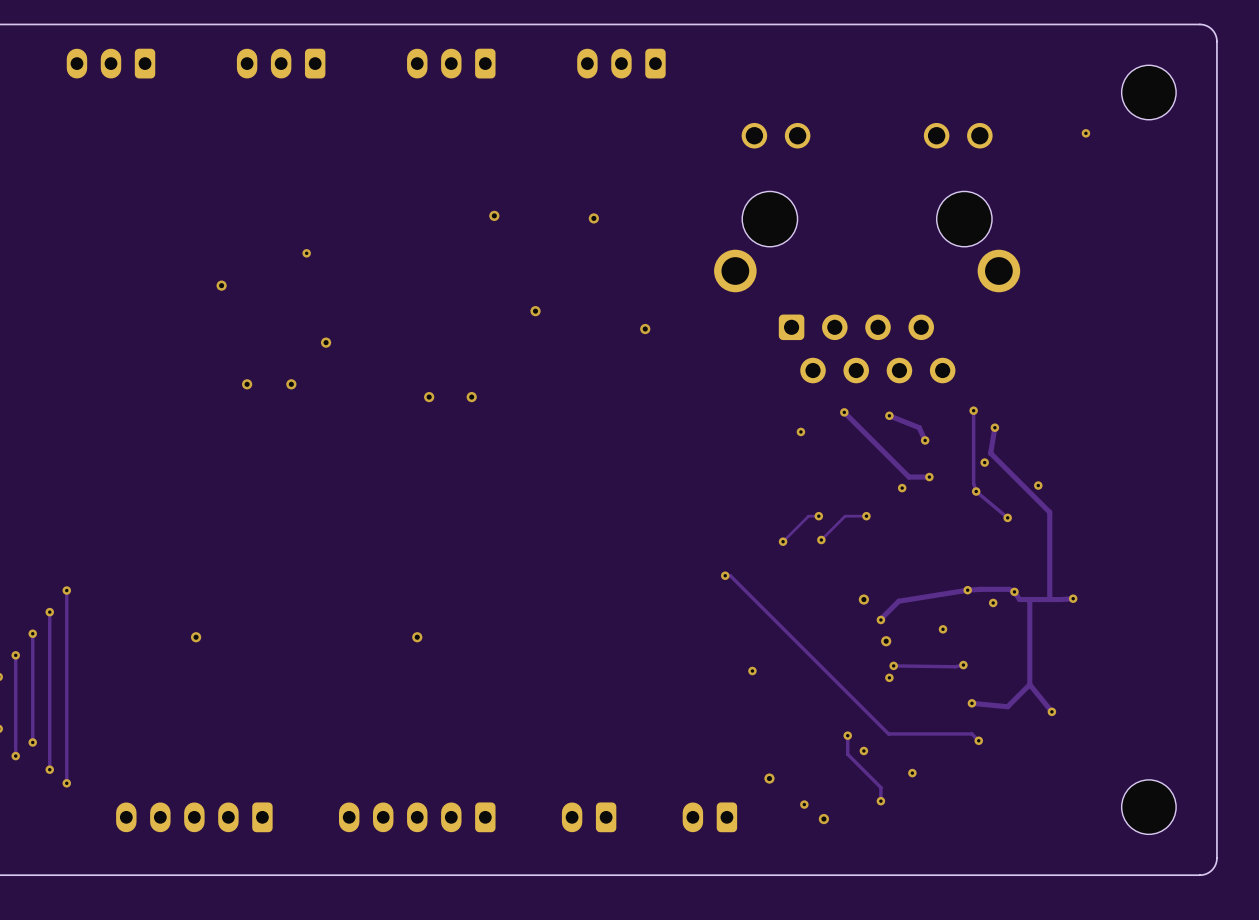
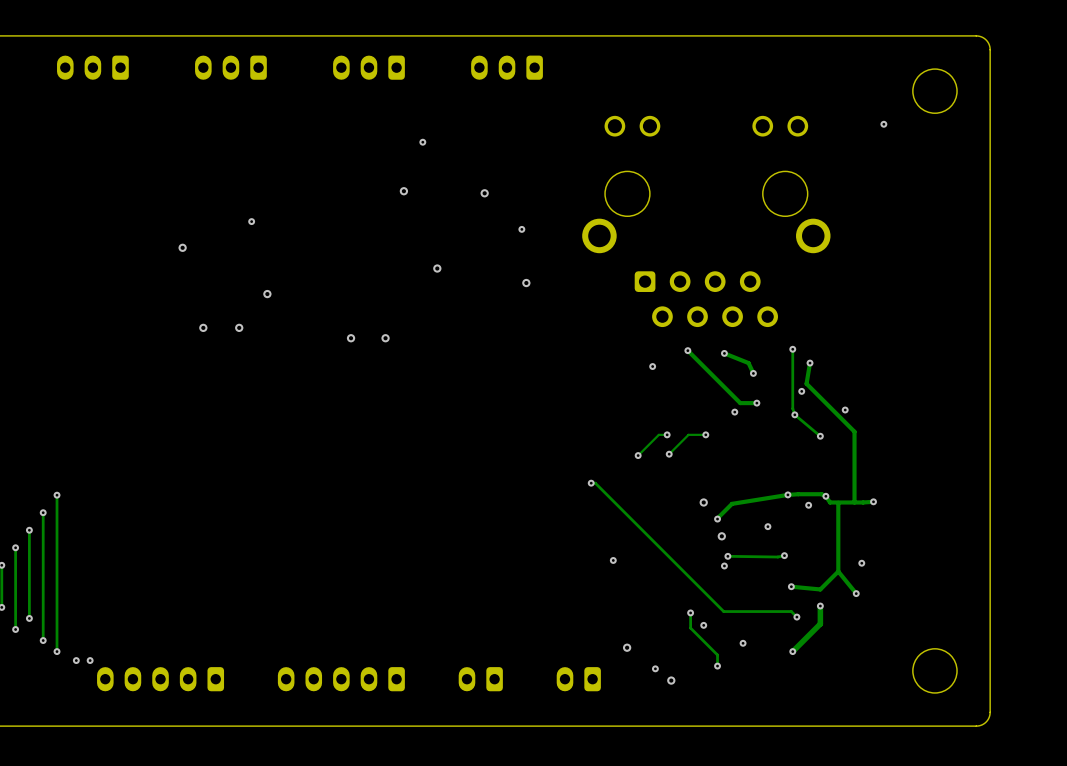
via: none -> (422, 142)
via: none -> (521, 229)
via: (196, 637) -> none
via: (417, 637) -> none
via: none -> (861, 563)
track: none -> (820, 606) (820, 623) (792, 651)
via: none -> (820, 606)
via: none -> (792, 651)
via: none -> (76, 660)
via: none -> (90, 660)

